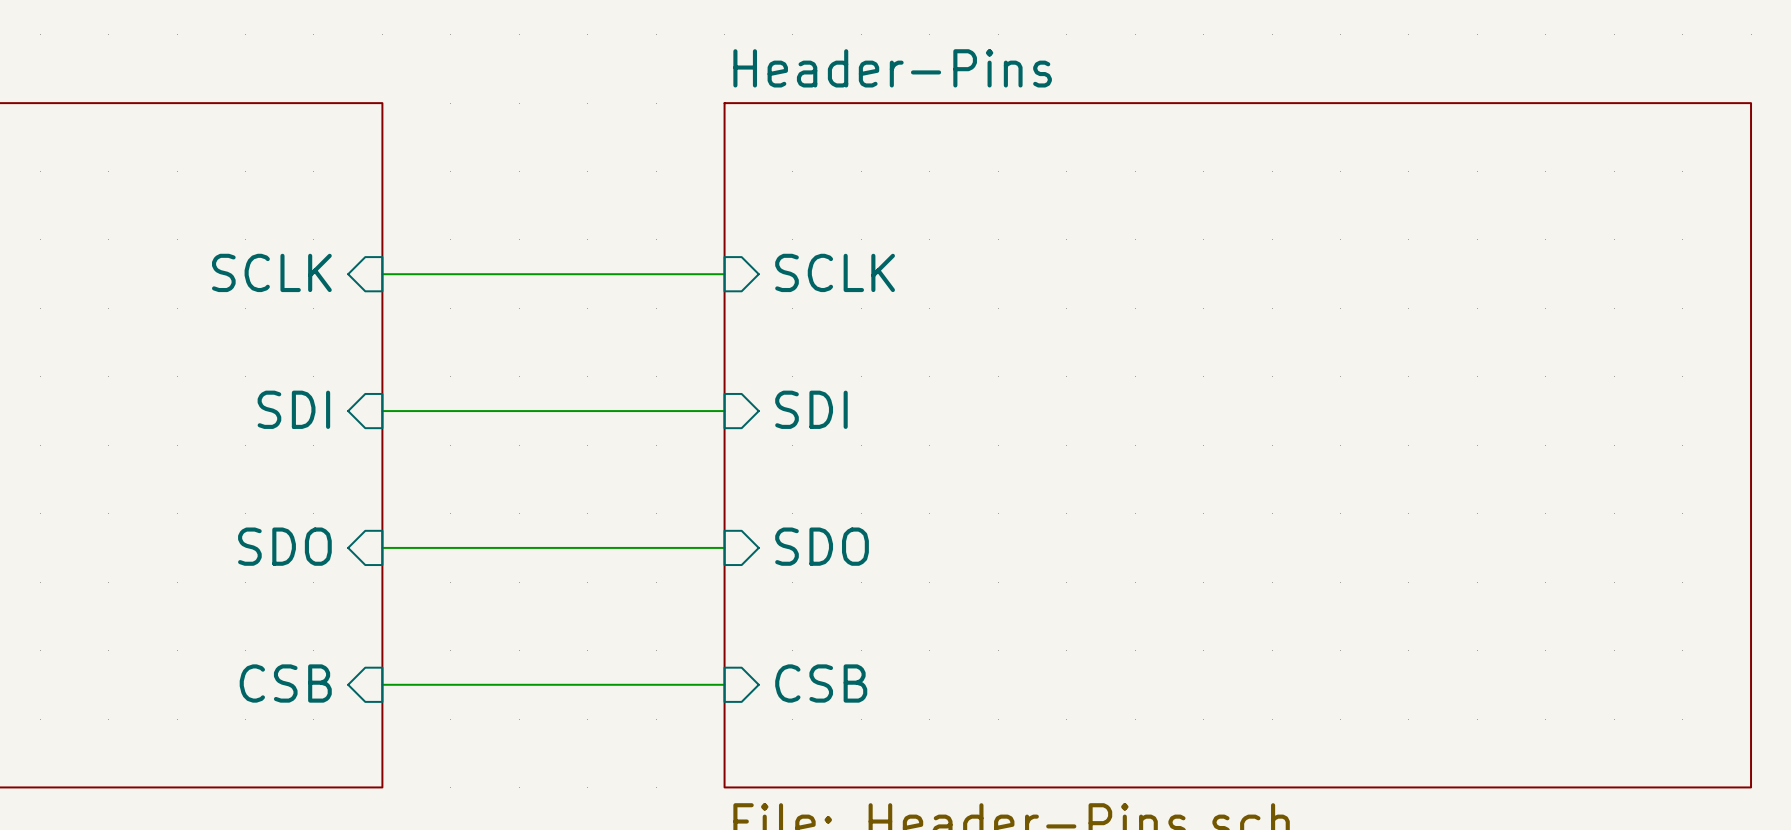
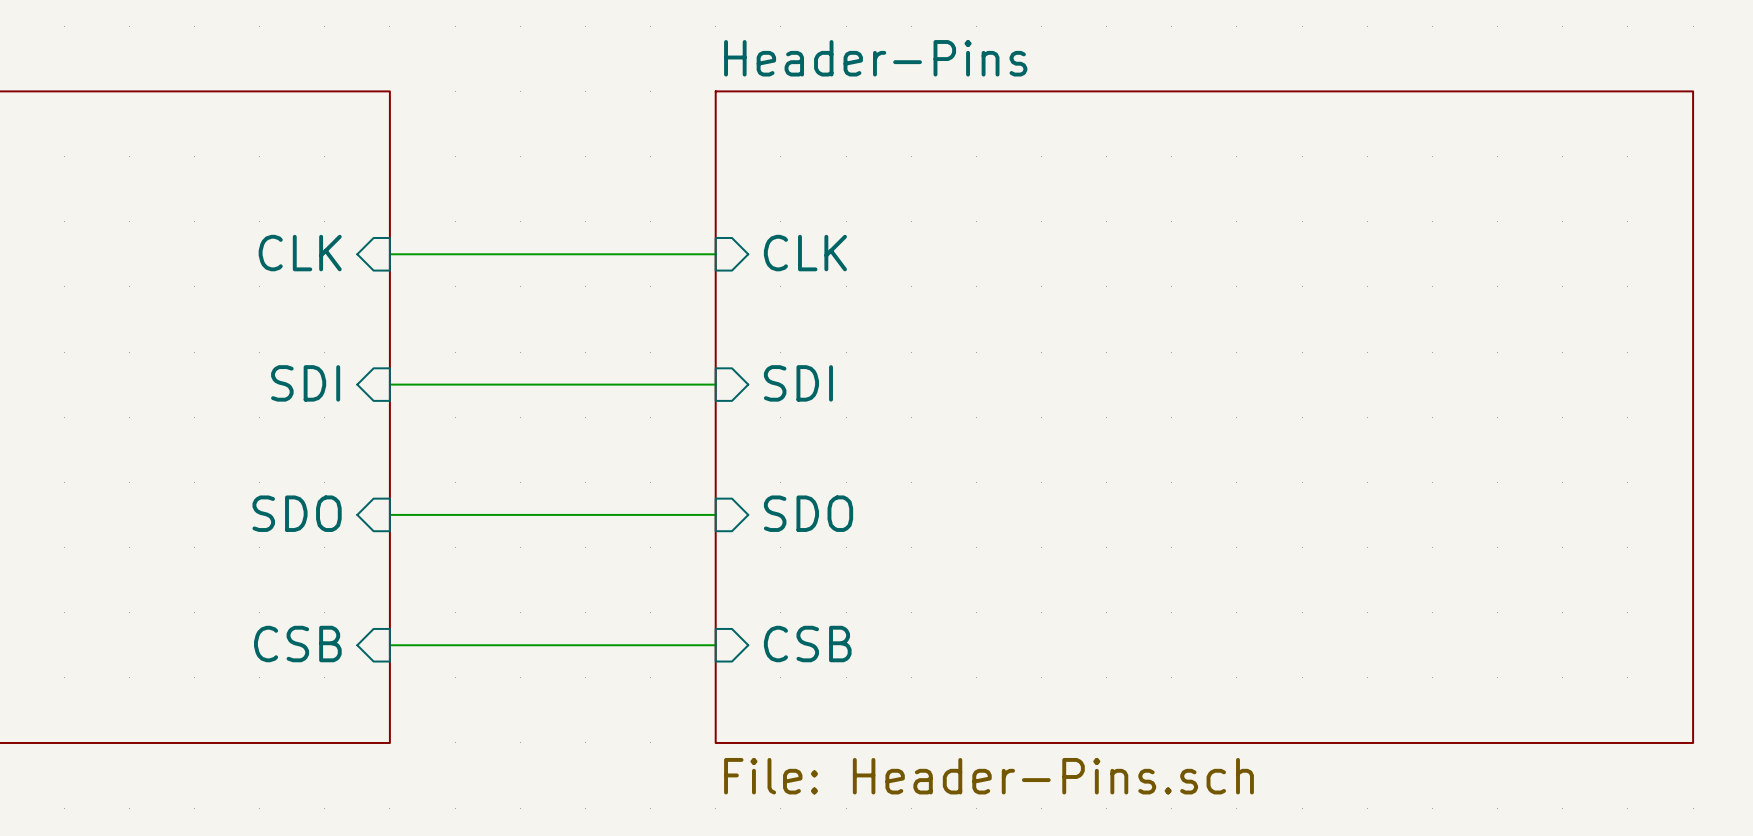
sheet pin: SCLK (271, 272) -> CLK (300, 253)
sheet pin: SCLK (835, 272) -> CLK (805, 253)

